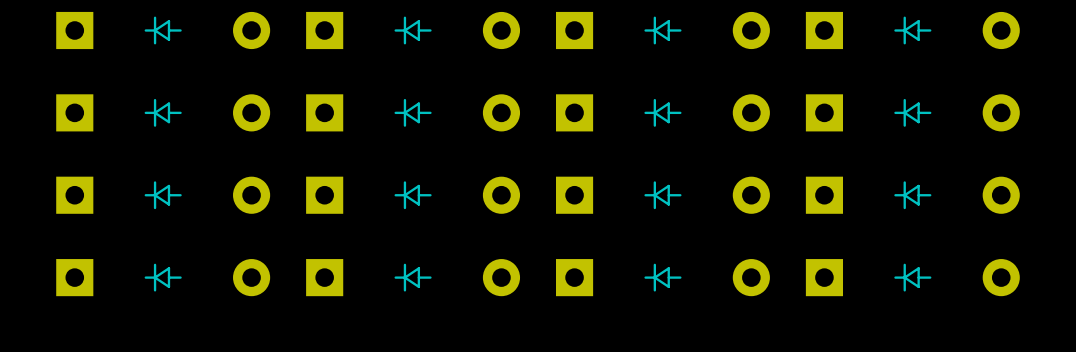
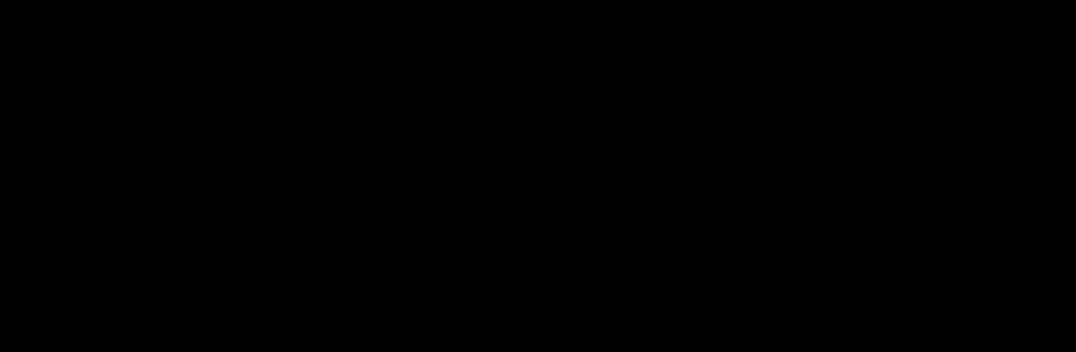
part: (163, 30) -> none
part: (413, 30) -> none
part: (662, 30) -> none
part: (912, 30) -> none
part: (163, 112) -> none
part: (413, 112) -> none
part: (662, 112) -> none
part: (912, 112) -> none
part: (163, 195) -> none
part: (413, 195) -> none
part: (662, 195) -> none
part: (912, 195) -> none
part: (163, 277) -> none
part: (413, 277) -> none
part: (662, 277) -> none
part: (912, 277) -> none

